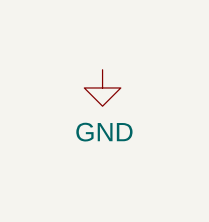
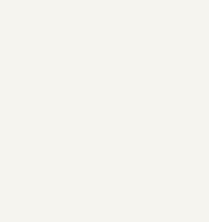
power symbol: GND (102, 87) -> none

